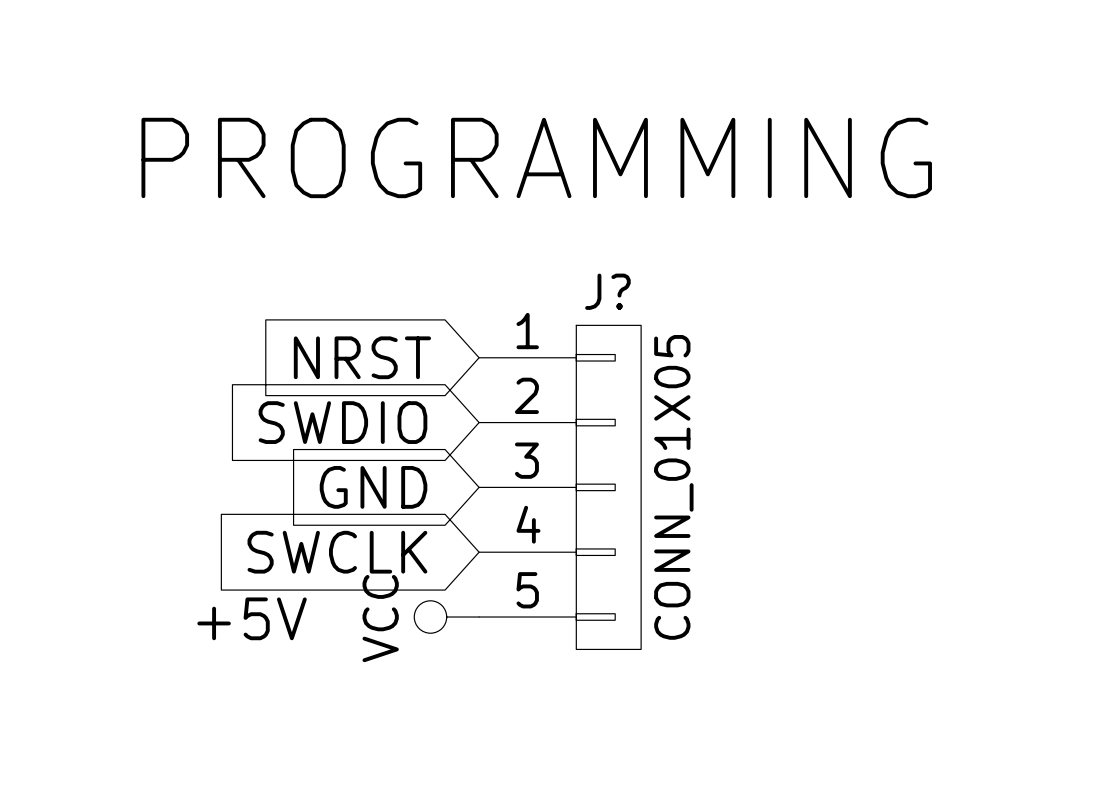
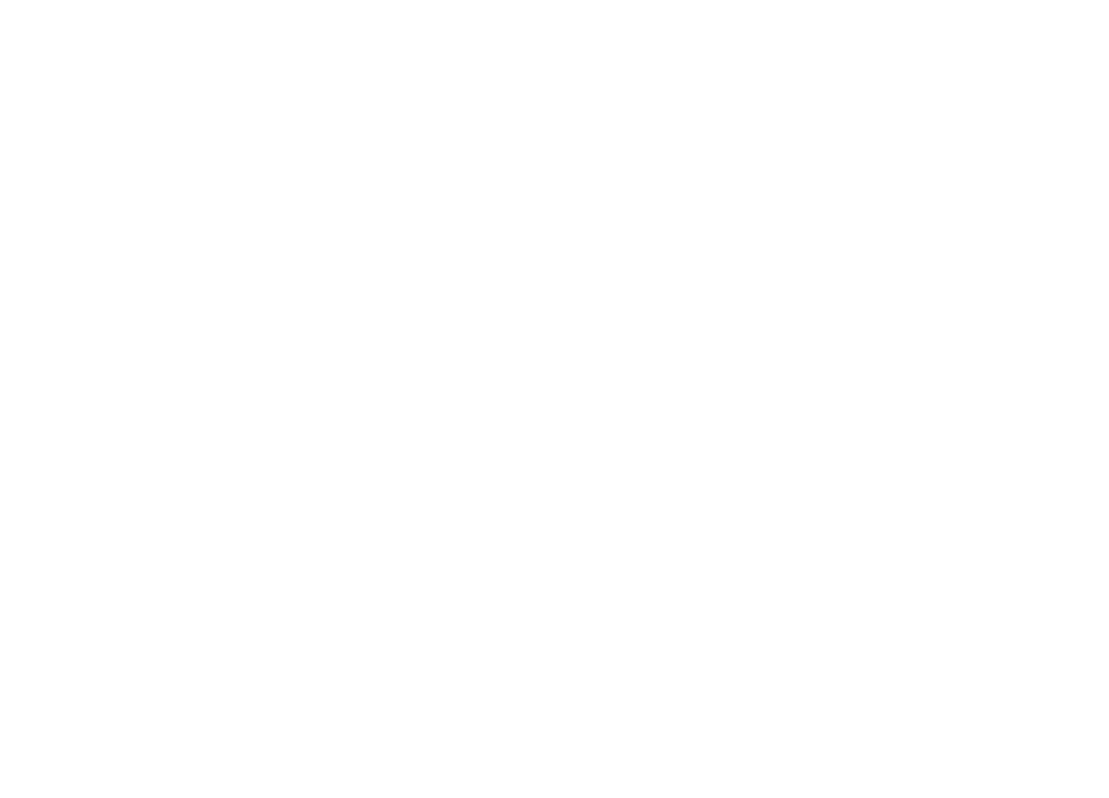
text: PROGRAMMING (536, 157) -> none
global label: NRST (362, 357) -> none
global label: SWDIO (342, 422) -> none
global label: GND (373, 487) -> none
J?: CONN_01X05 (560, 487) -> none
global label: SWCLK (337, 552) -> none
power symbol: VCC (446, 617) -> none
text: +5V (252, 618) -> none

